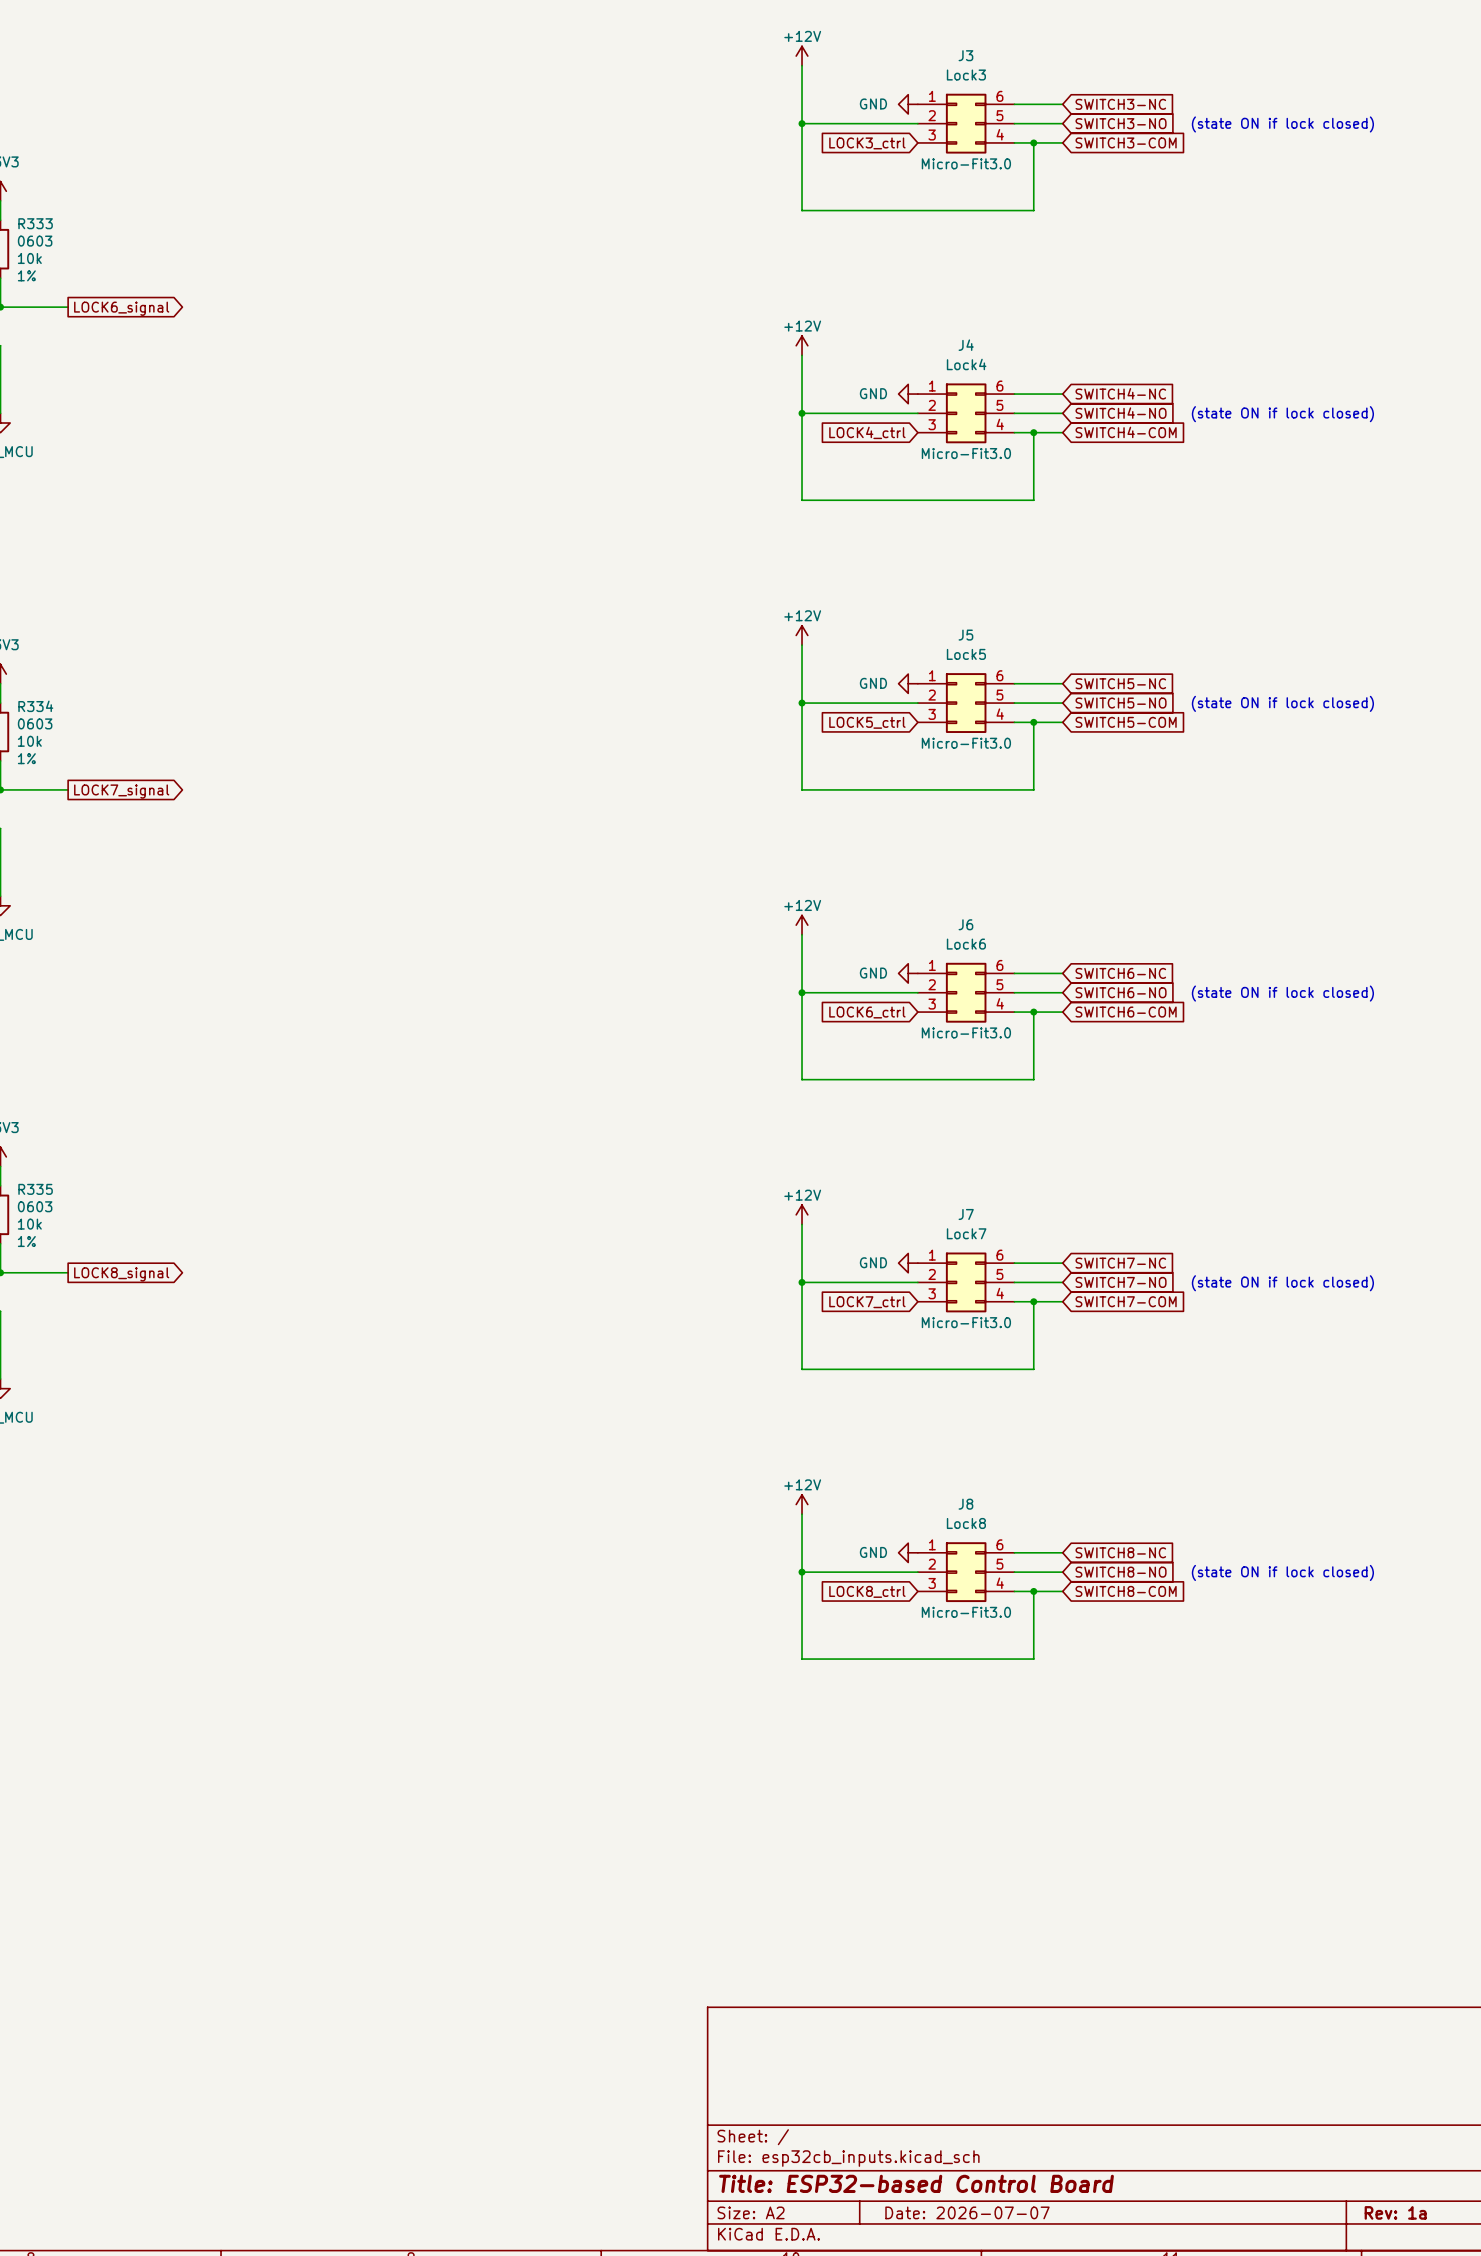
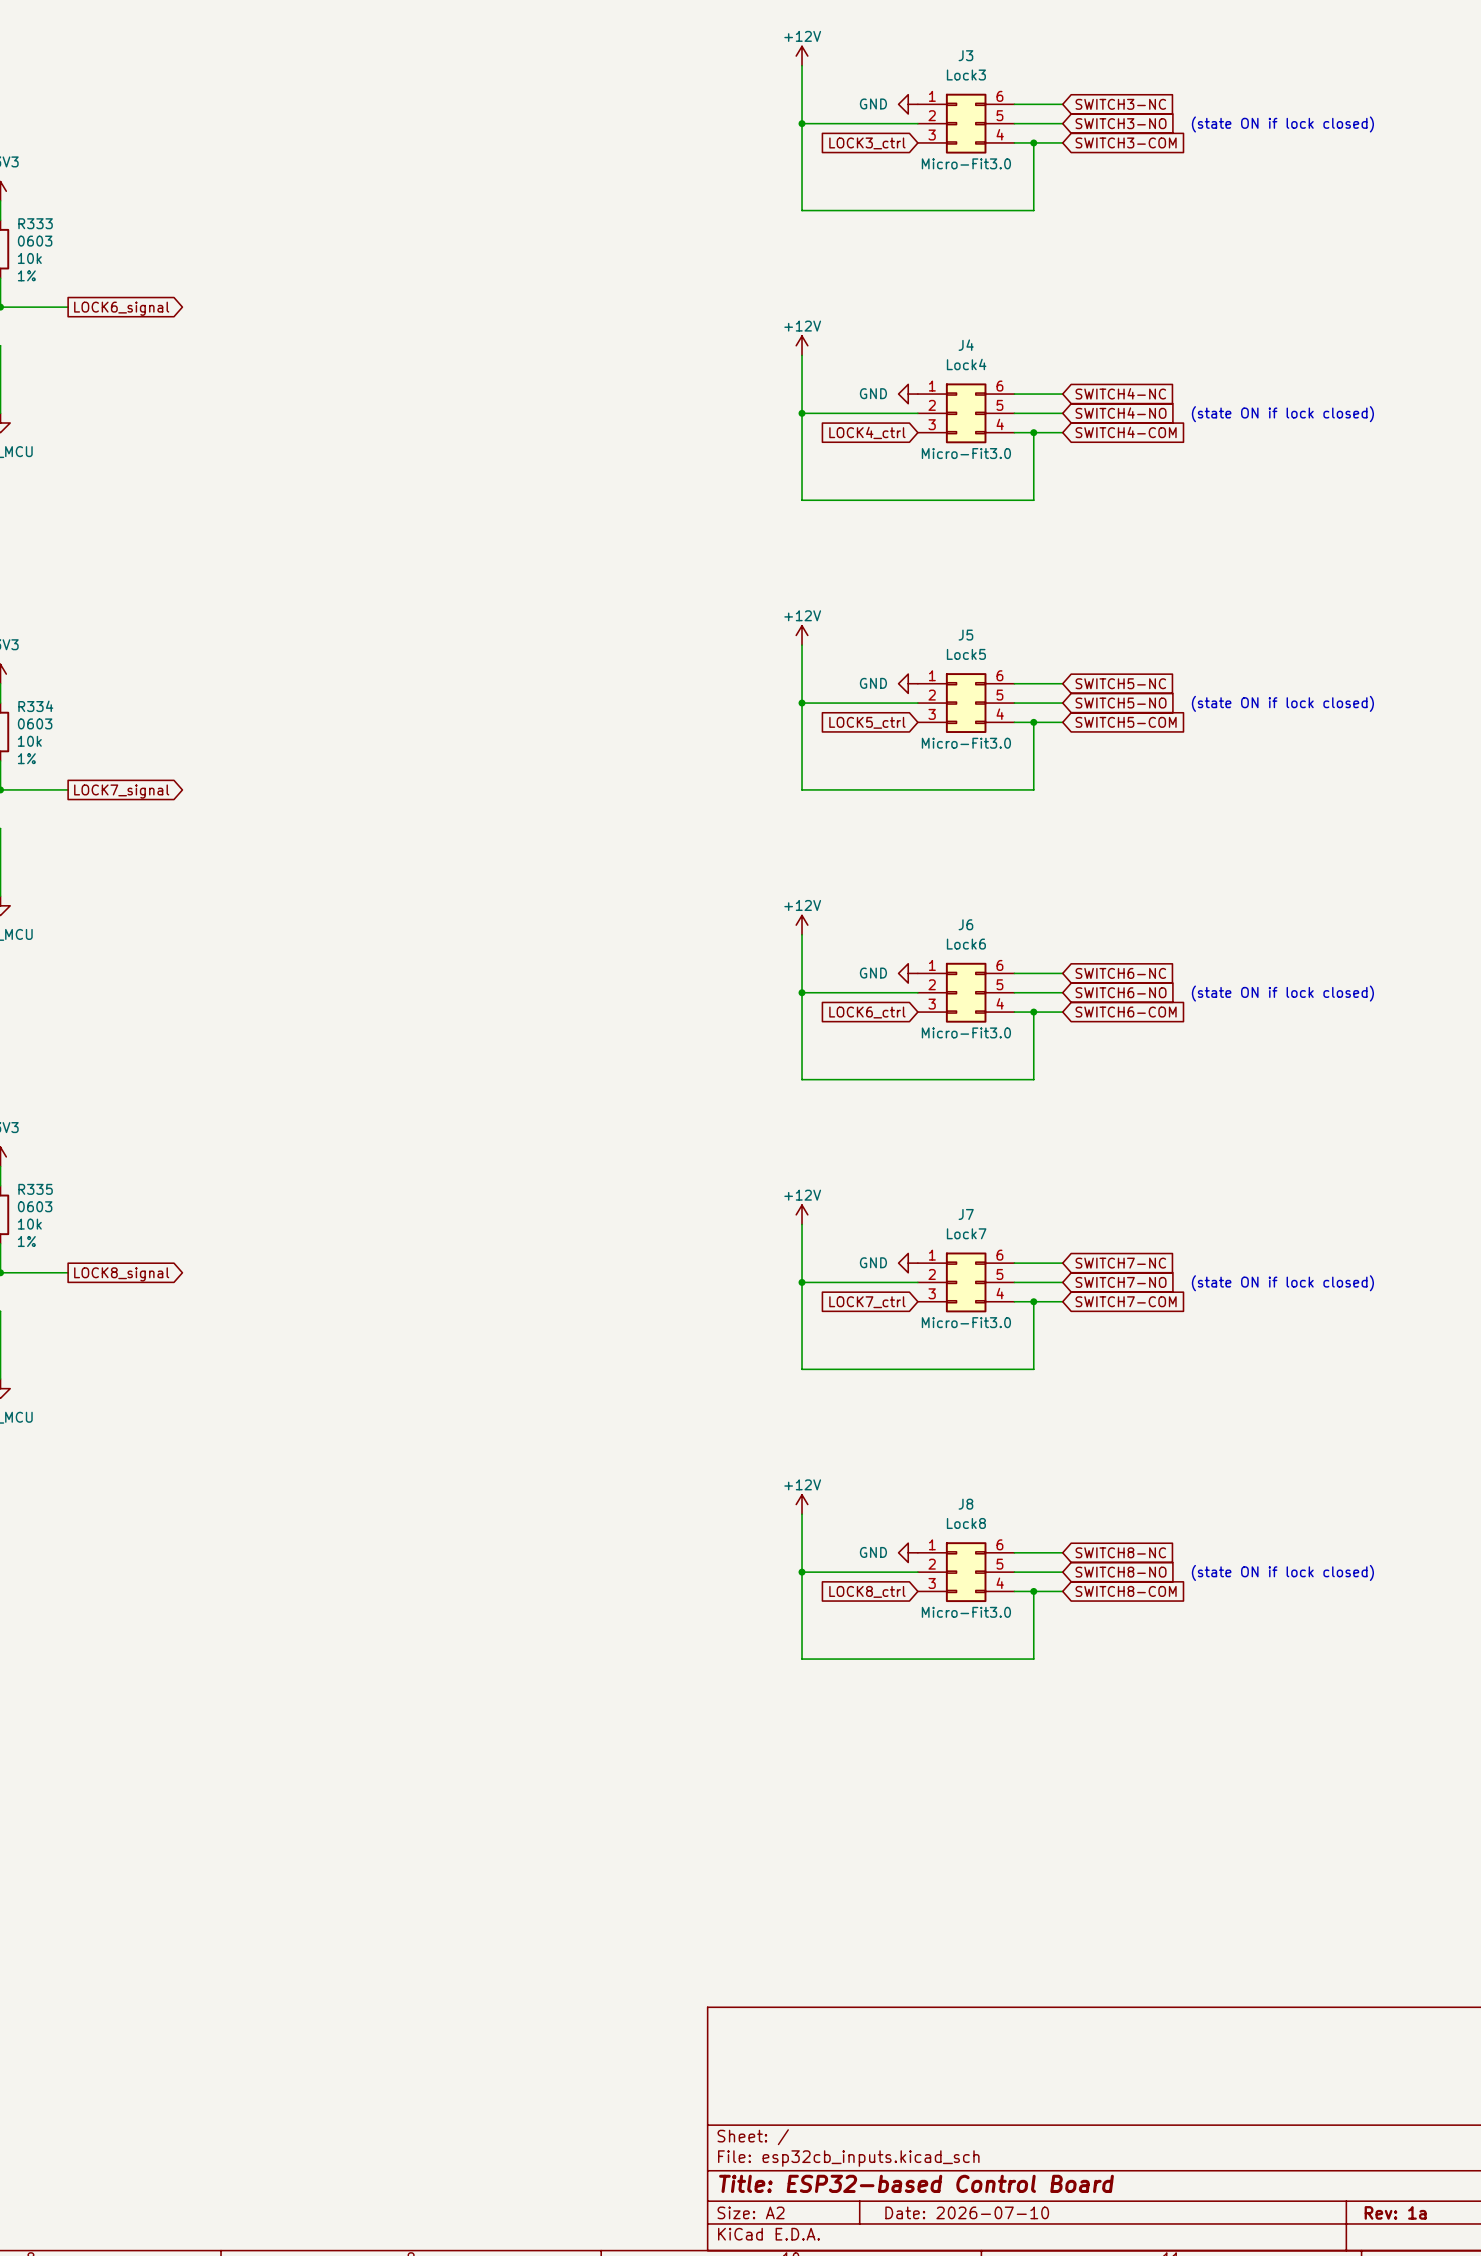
title block: Date: 2026-07-07 (967, 2212) -> Date: 2026-07-10 (967, 2212)

